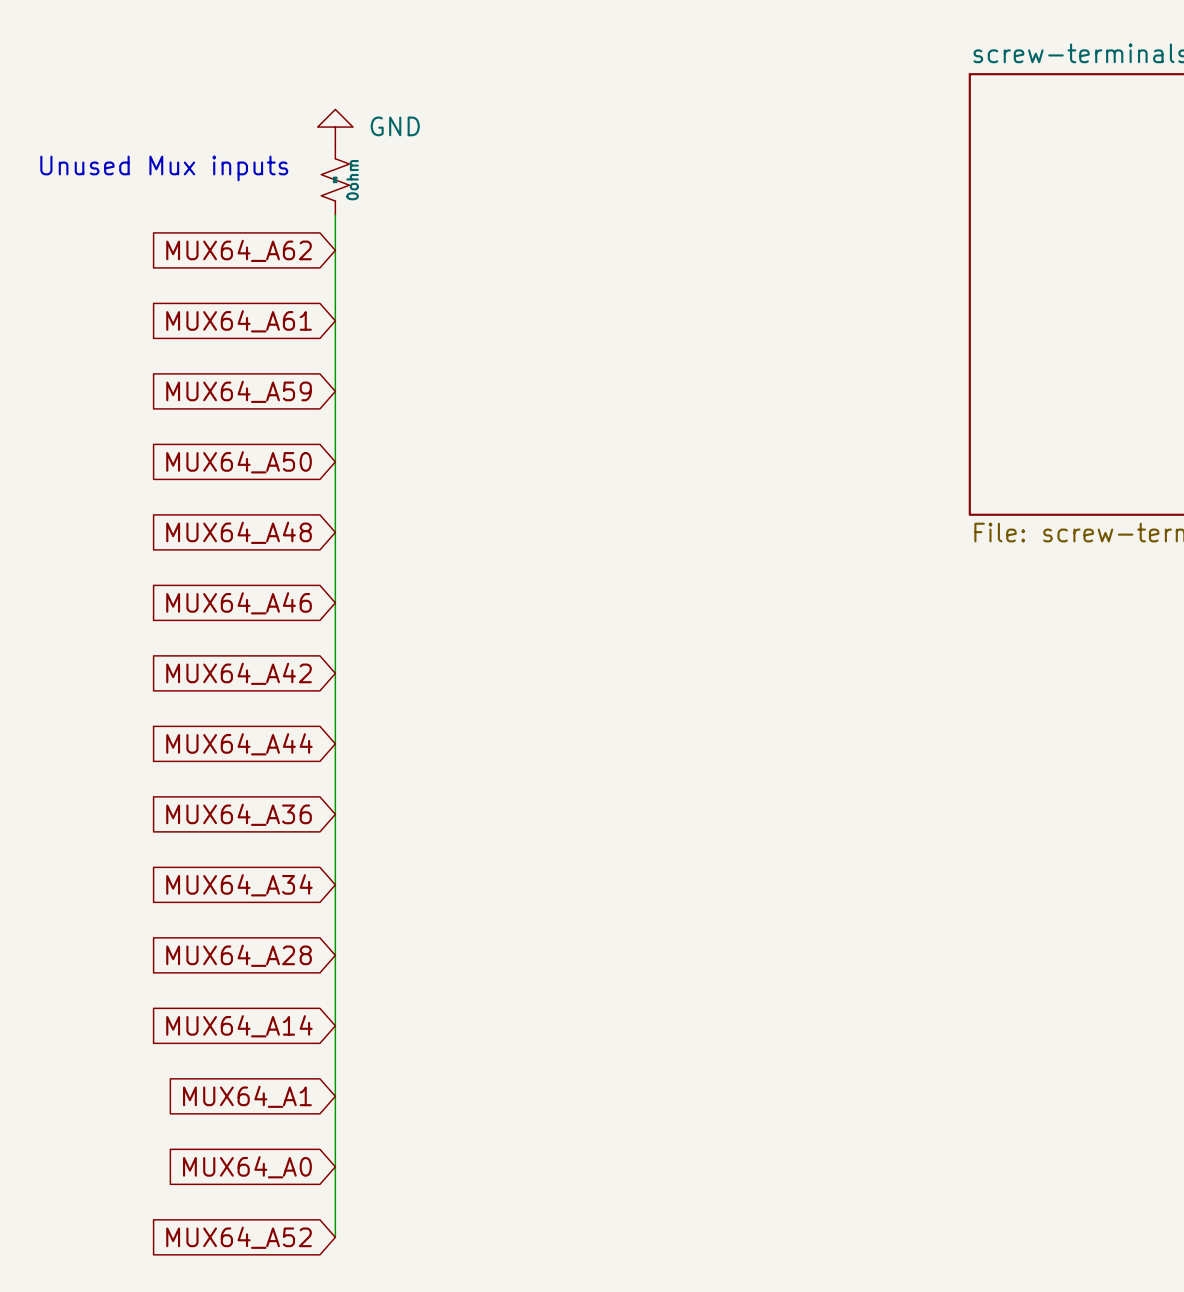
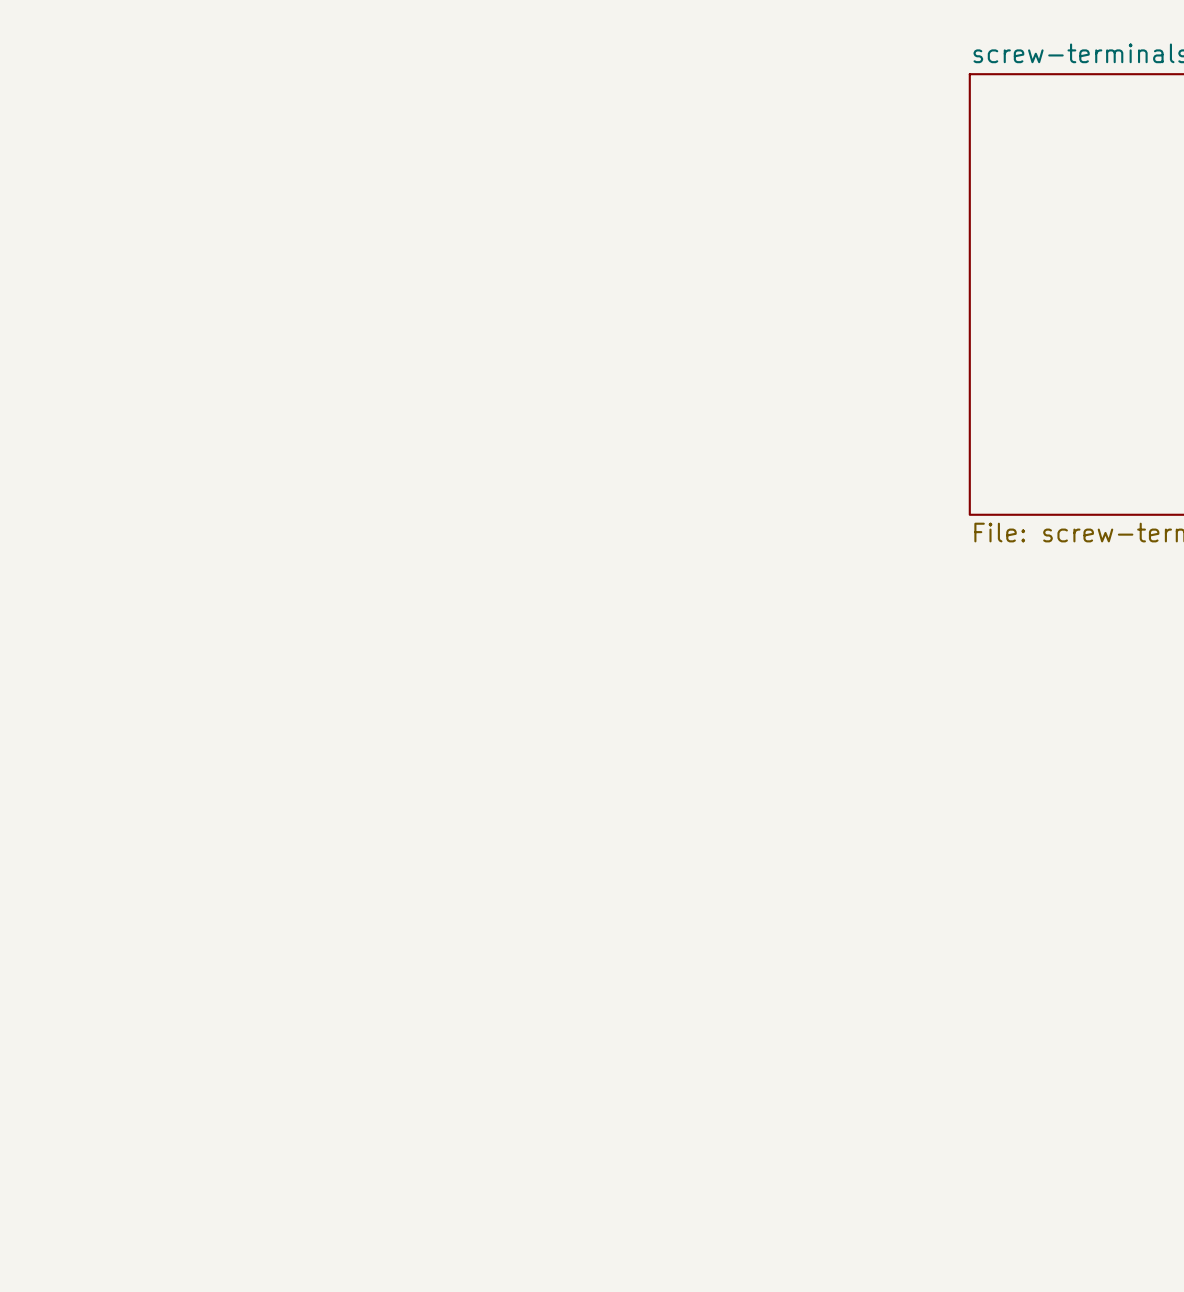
power symbol: GND (335, 127) -> none
text: Unused Mux inputs (164, 168) -> none
part: 0ohm (335, 179) -> none
wire: (335, 215) (335, 1237) -> none
global label: MUX64_A62 (239, 250) -> none
global label: MUX64_A61 (239, 321) -> none
global label: MUX64_A59 (239, 391) -> none
global label: MUX64_A50 (239, 462) -> none
global label: MUX64_A48 (239, 532) -> none
global label: MUX64_A46 (239, 603) -> none
global label: MUX64_A42 (239, 673) -> none
global label: MUX64_A44 (239, 744) -> none
global label: MUX64_A36 (239, 814) -> none
global label: MUX64_A34 (239, 885) -> none
global label: MUX64_A28 (239, 955) -> none
global label: MUX64_A14 (239, 1026) -> none
global label: MUX64_A1 (247, 1096) -> none
global label: MUX64_A0 (247, 1167) -> none
global label: MUX64_A52 (239, 1237) -> none

